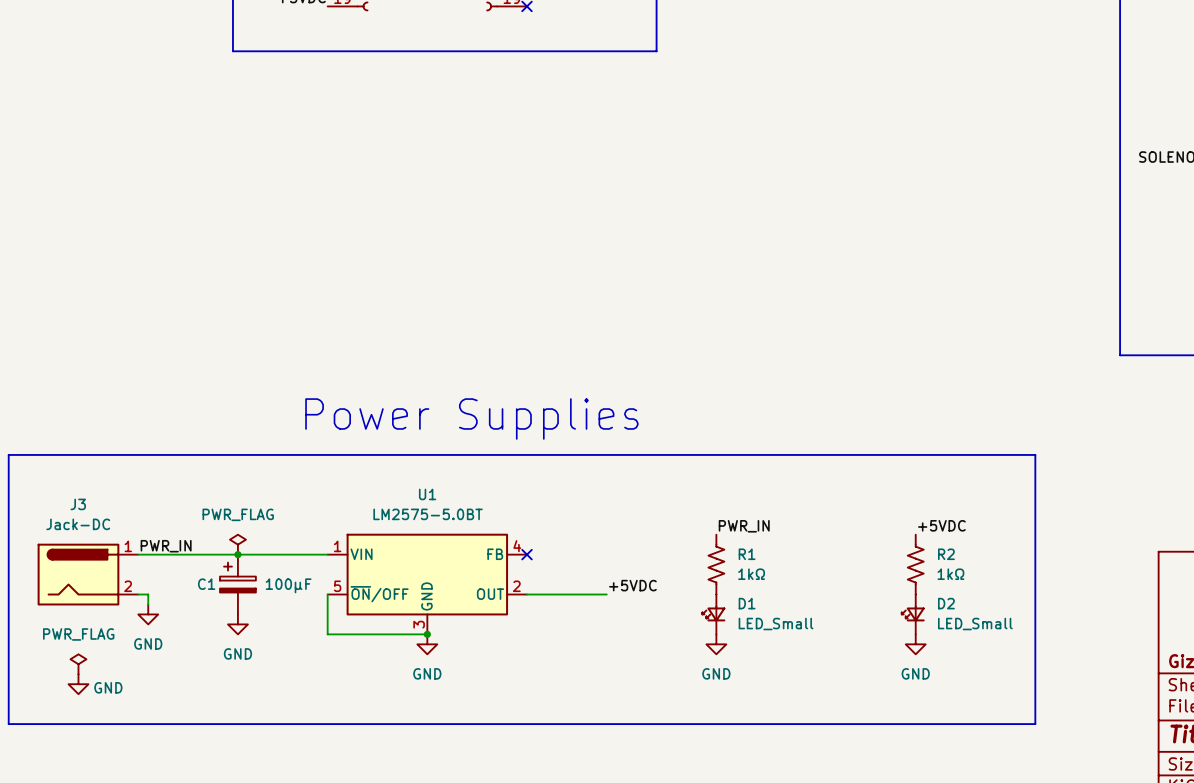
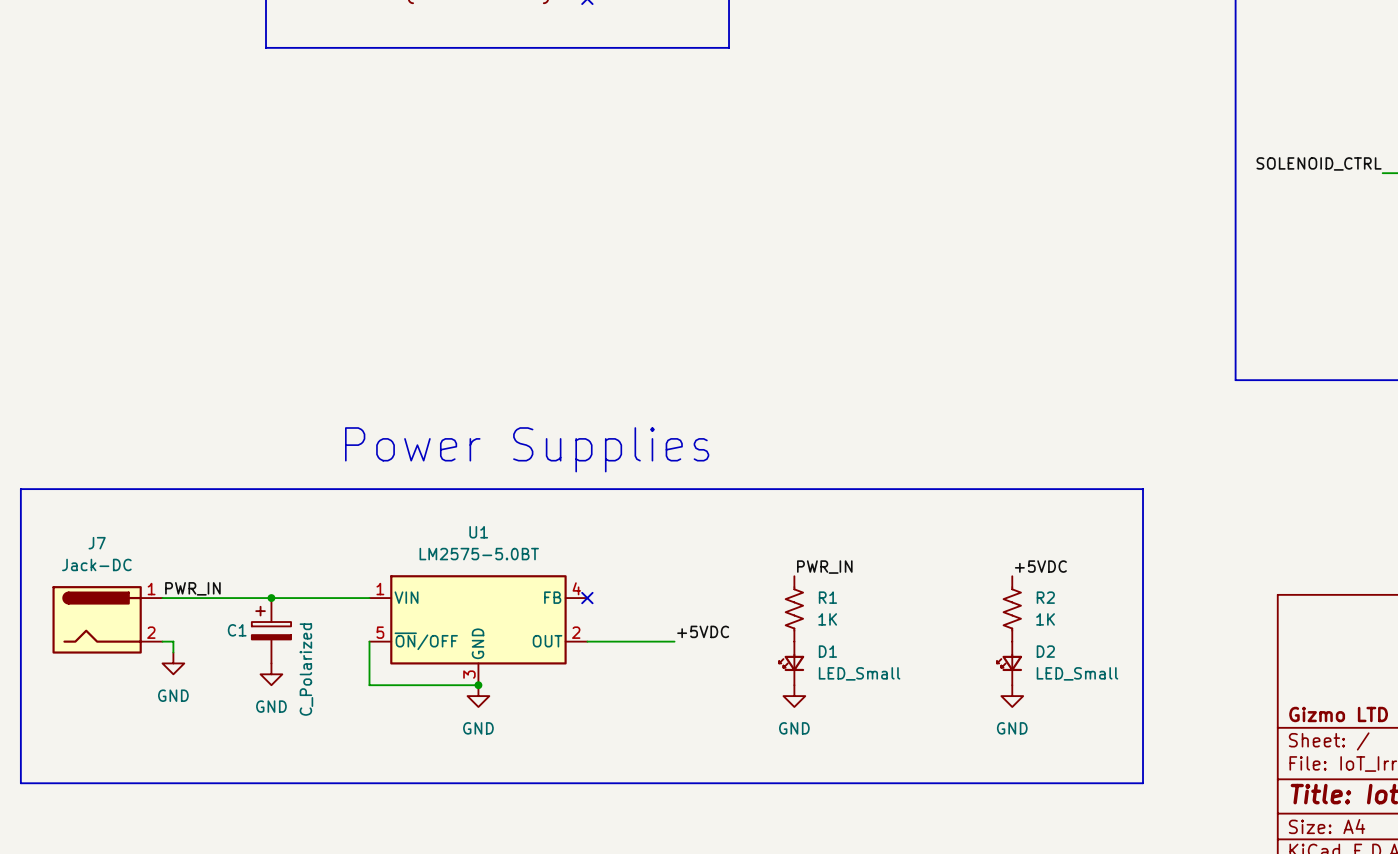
J3 name: J3 (78, 504) -> J7 (97, 543)
power symbol: PWR_FLAG (237, 544) -> none
R1 value: 1kΩ (751, 574) -> 1K (827, 619)
R2 value: 1kΩ (950, 574) -> 1K (1045, 619)
C1 value: 100µF (288, 585) -> C_Polarized (306, 669)
power symbol: PWR_FLAG (78, 664) -> none
power symbol: GND (78, 684) -> none

